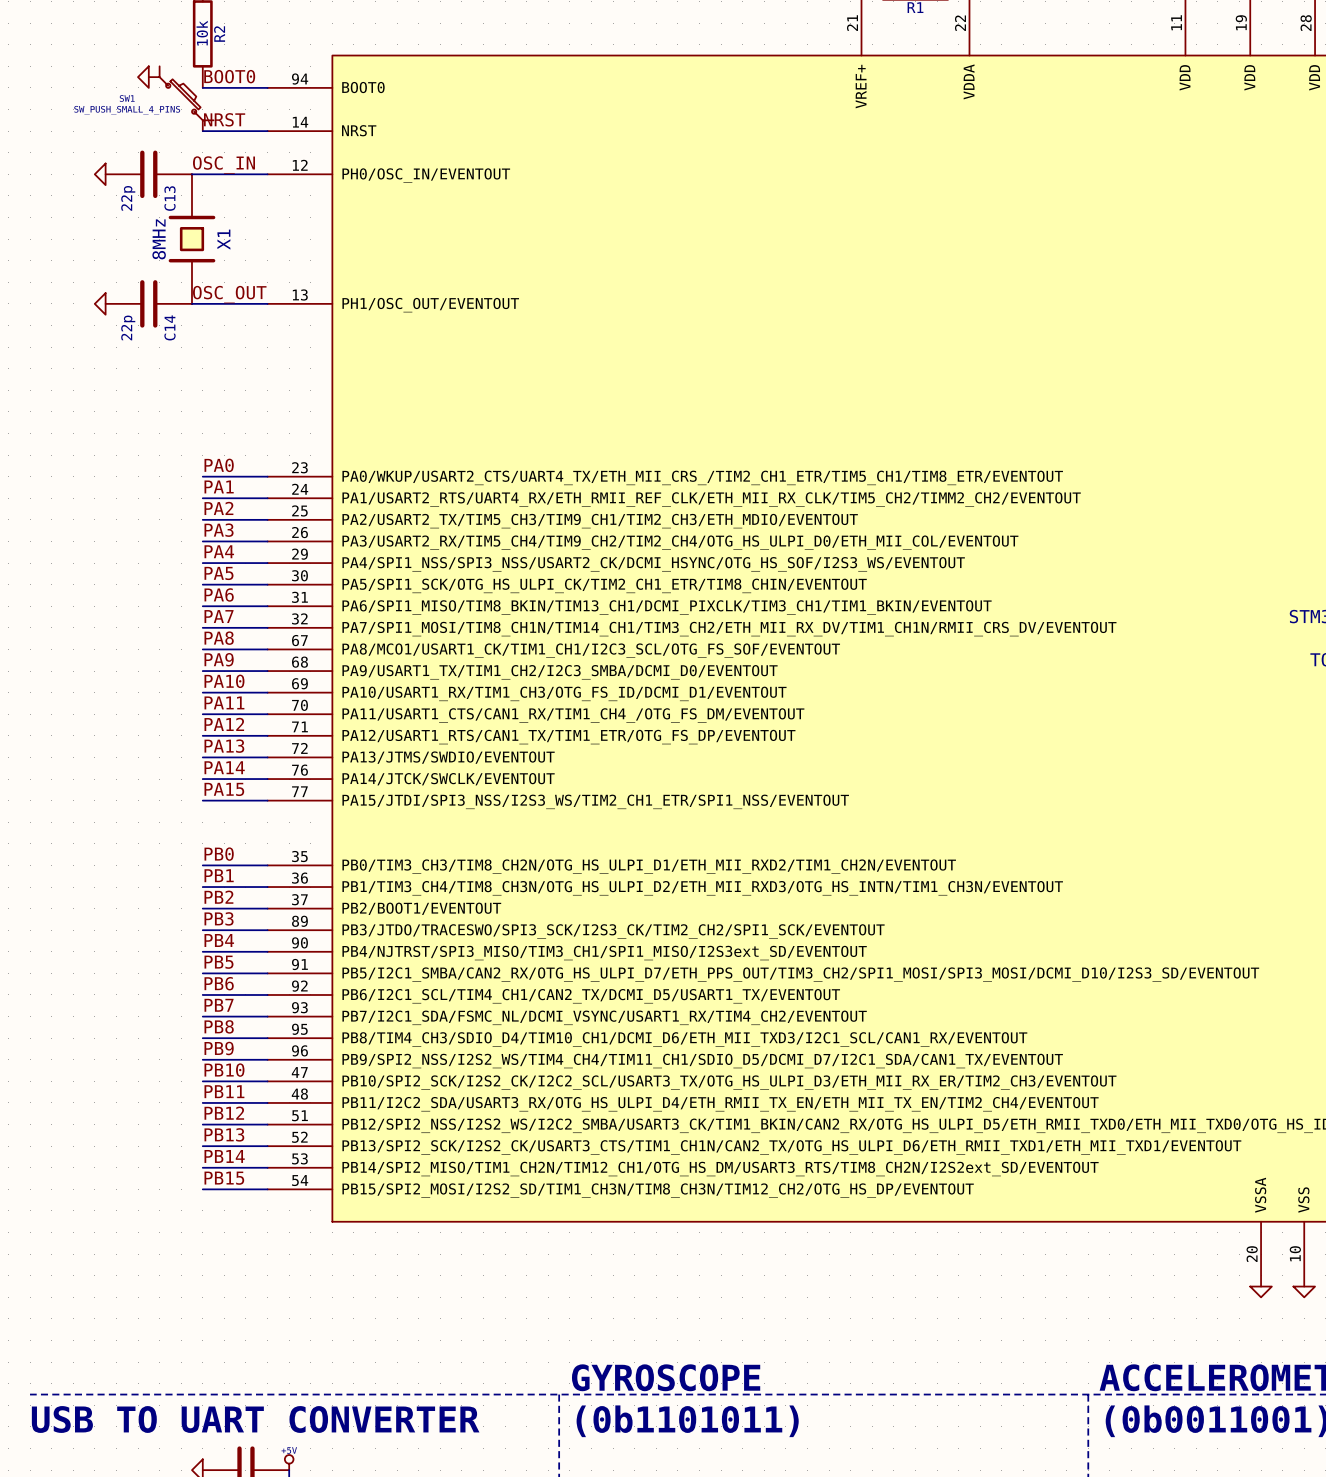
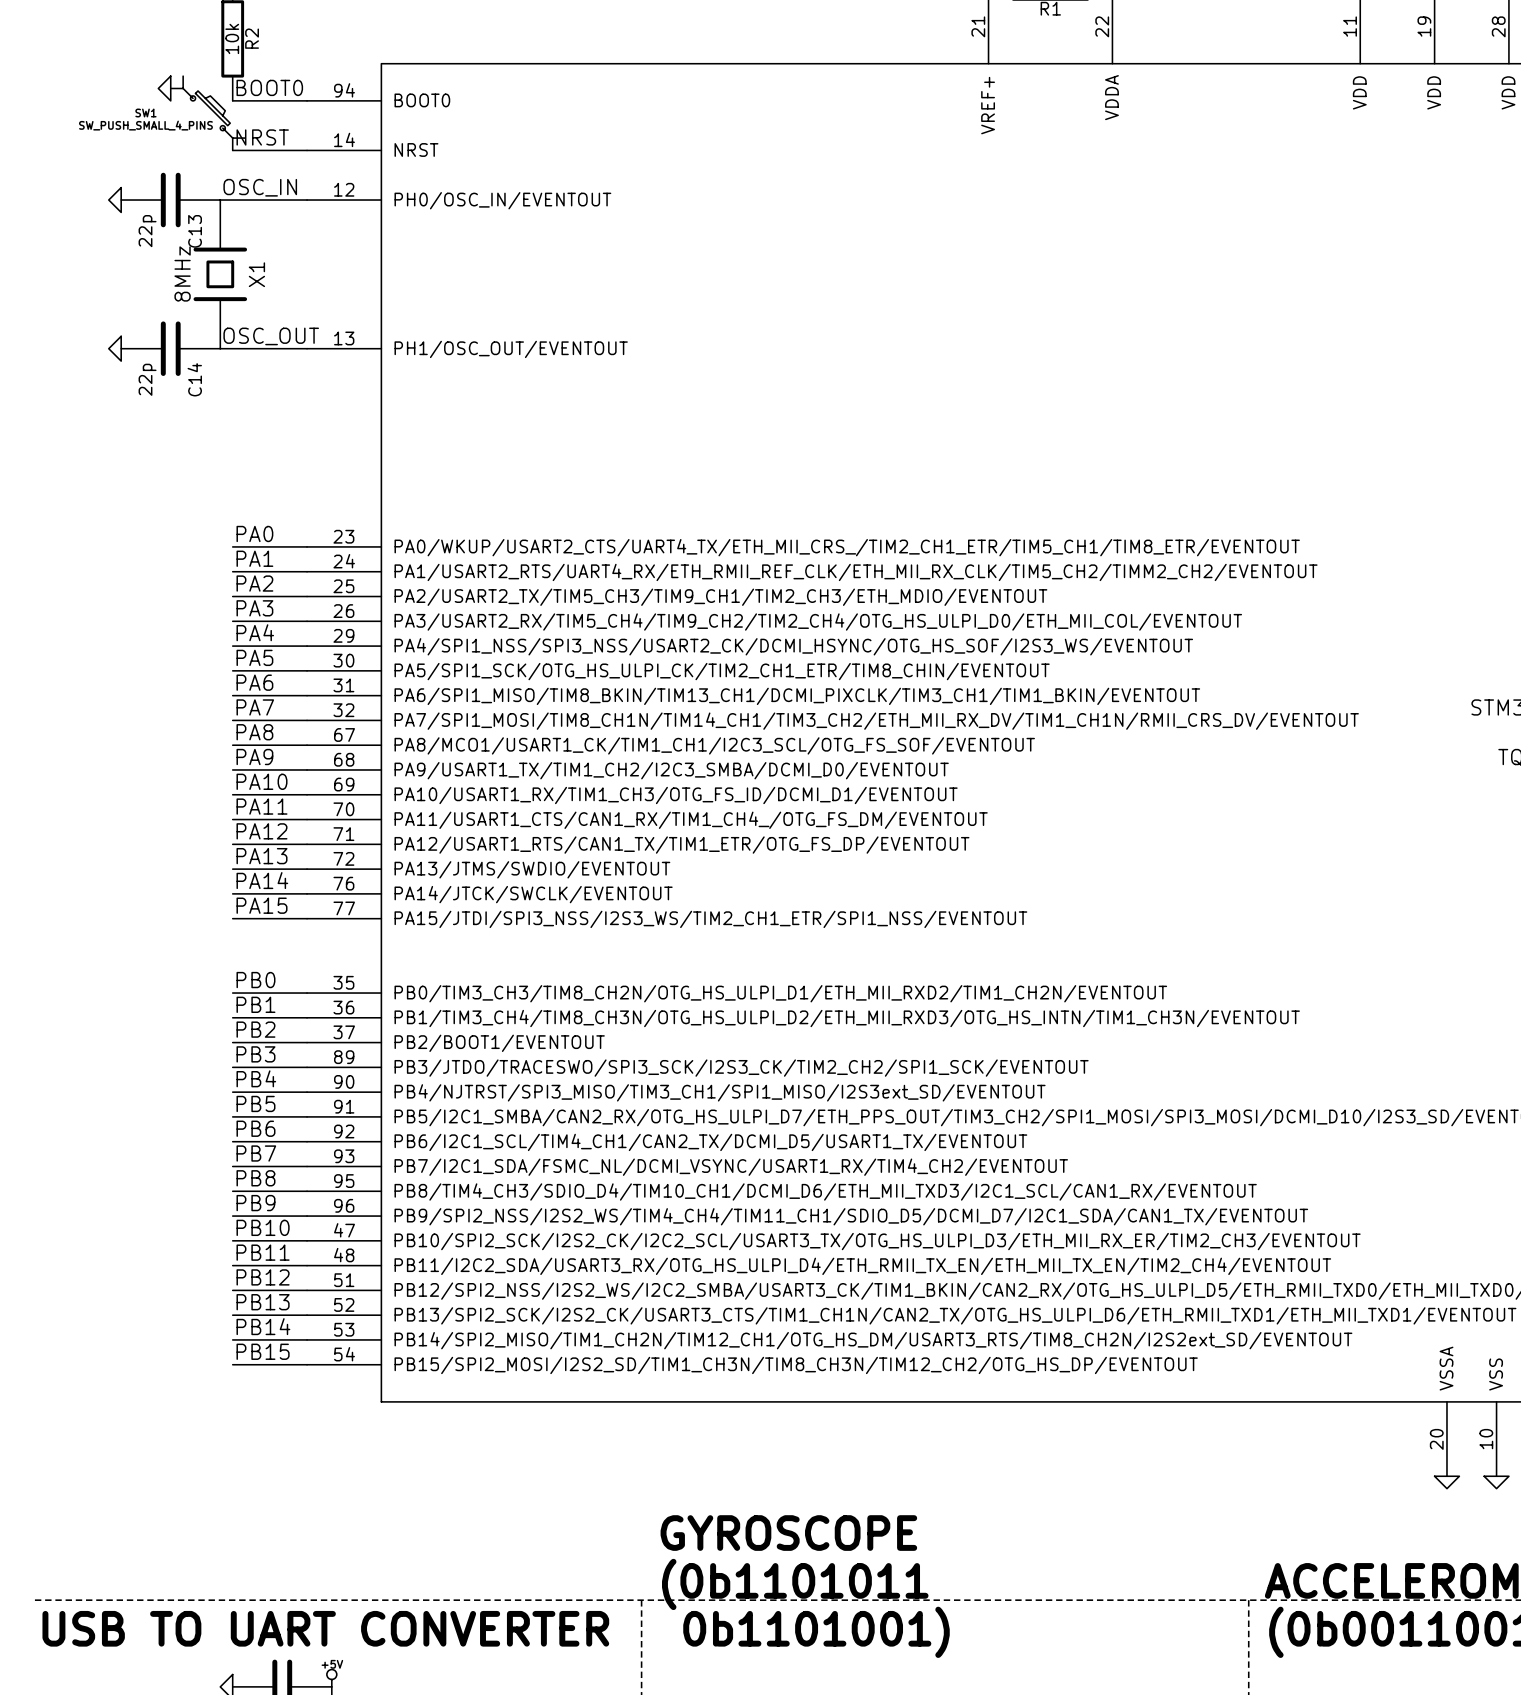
text: none -> GYROSCOPE (788, 1533)
text: GYROSCOPE (666, 1377) -> (0b1101011 (795, 1584)
text: (0b1101011) (687, 1421) -> 0b1101001) (816, 1632)

